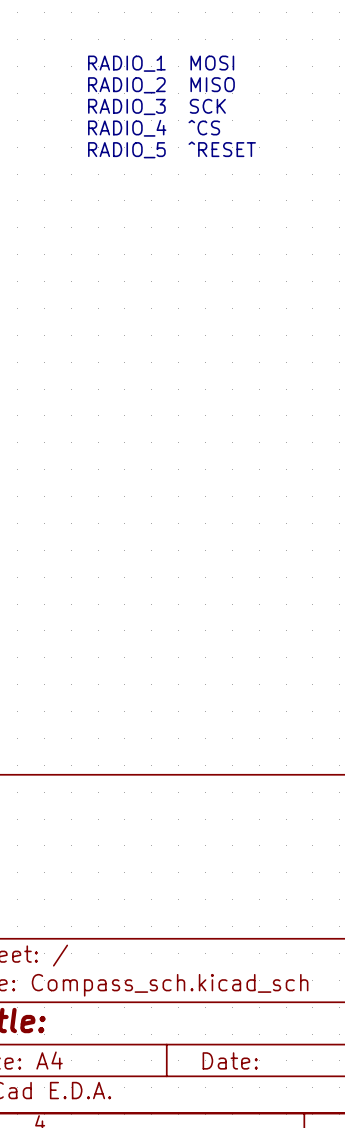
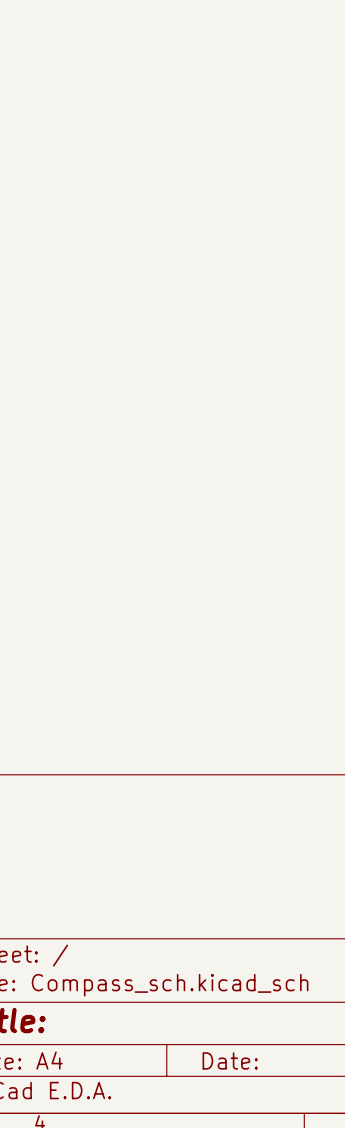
text: RADIO_1 MOSI (161, 63) -> none
text: RADIO_2 MISO (161, 85) -> none
text: RADIO_3 SCK (156, 106) -> none
text: RADIO_4 ^CS (154, 128) -> none
text: RADIO_5 ^RESET (172, 149) -> none

